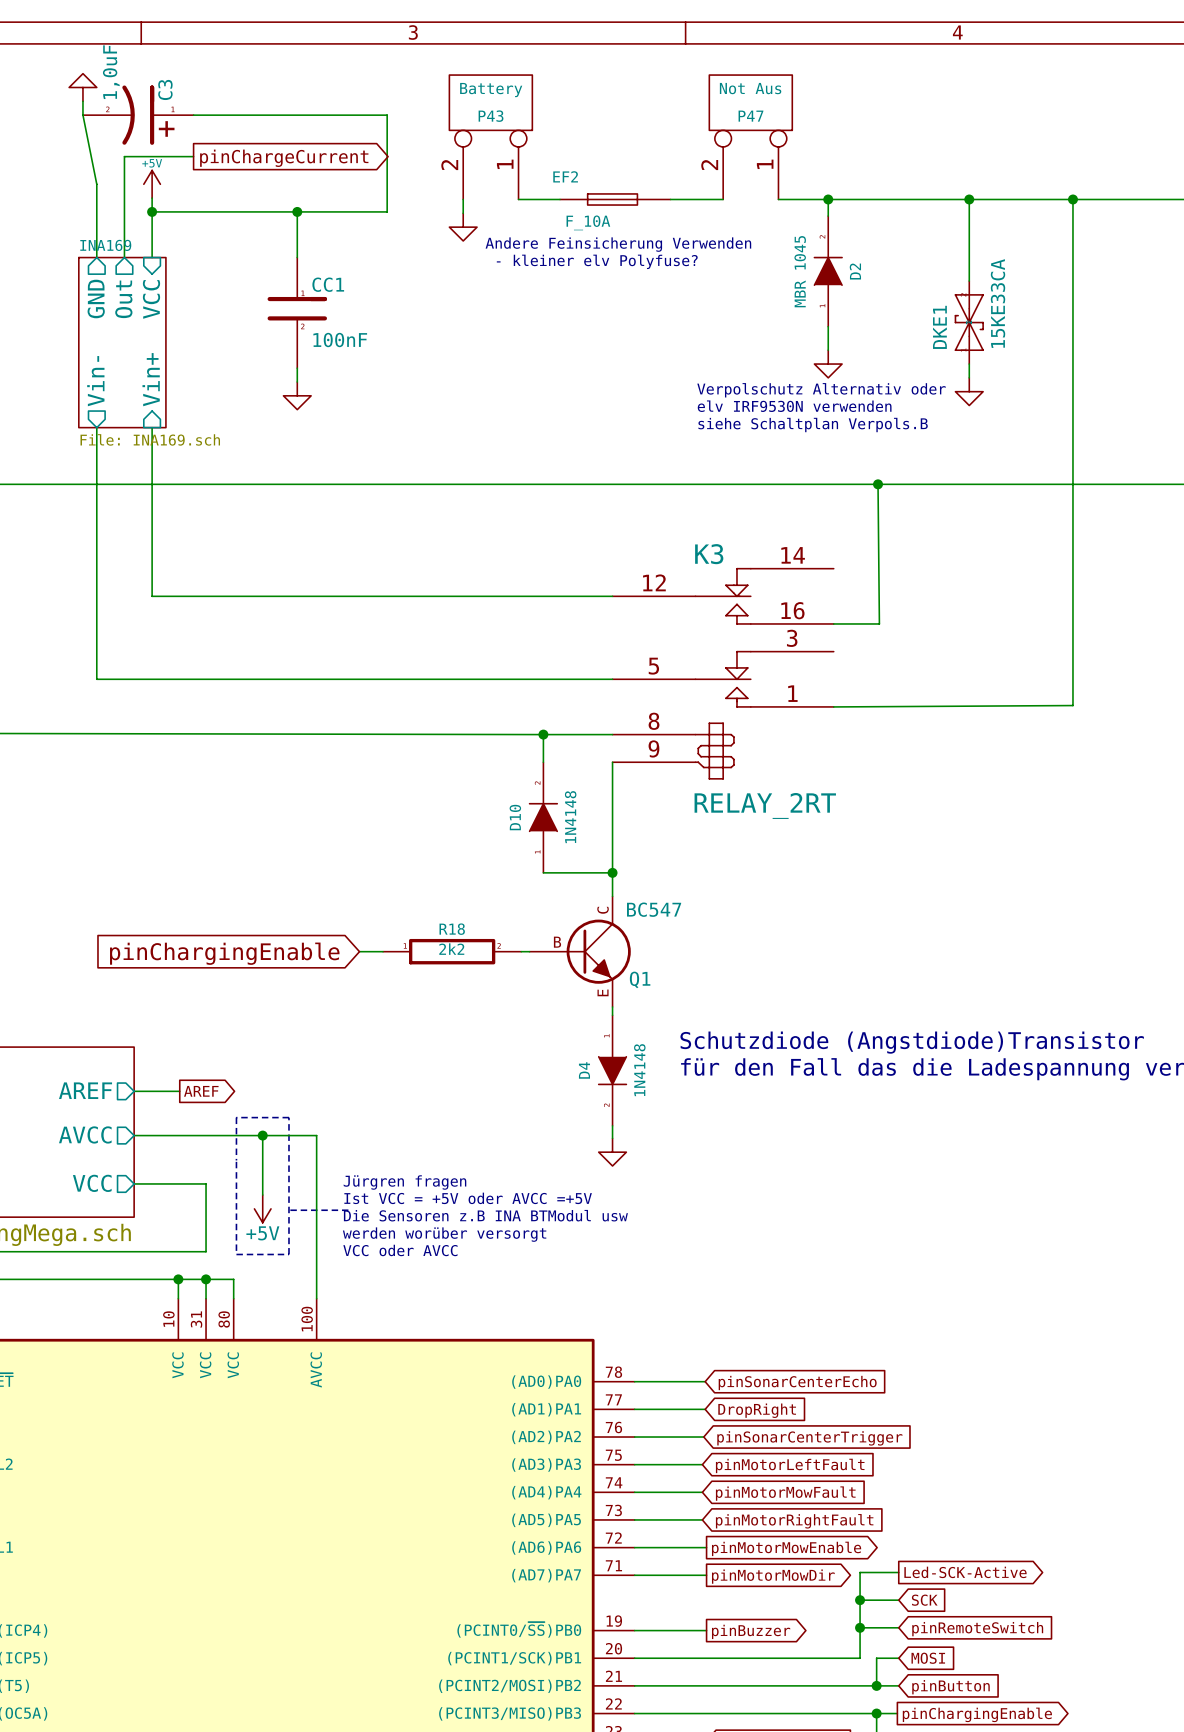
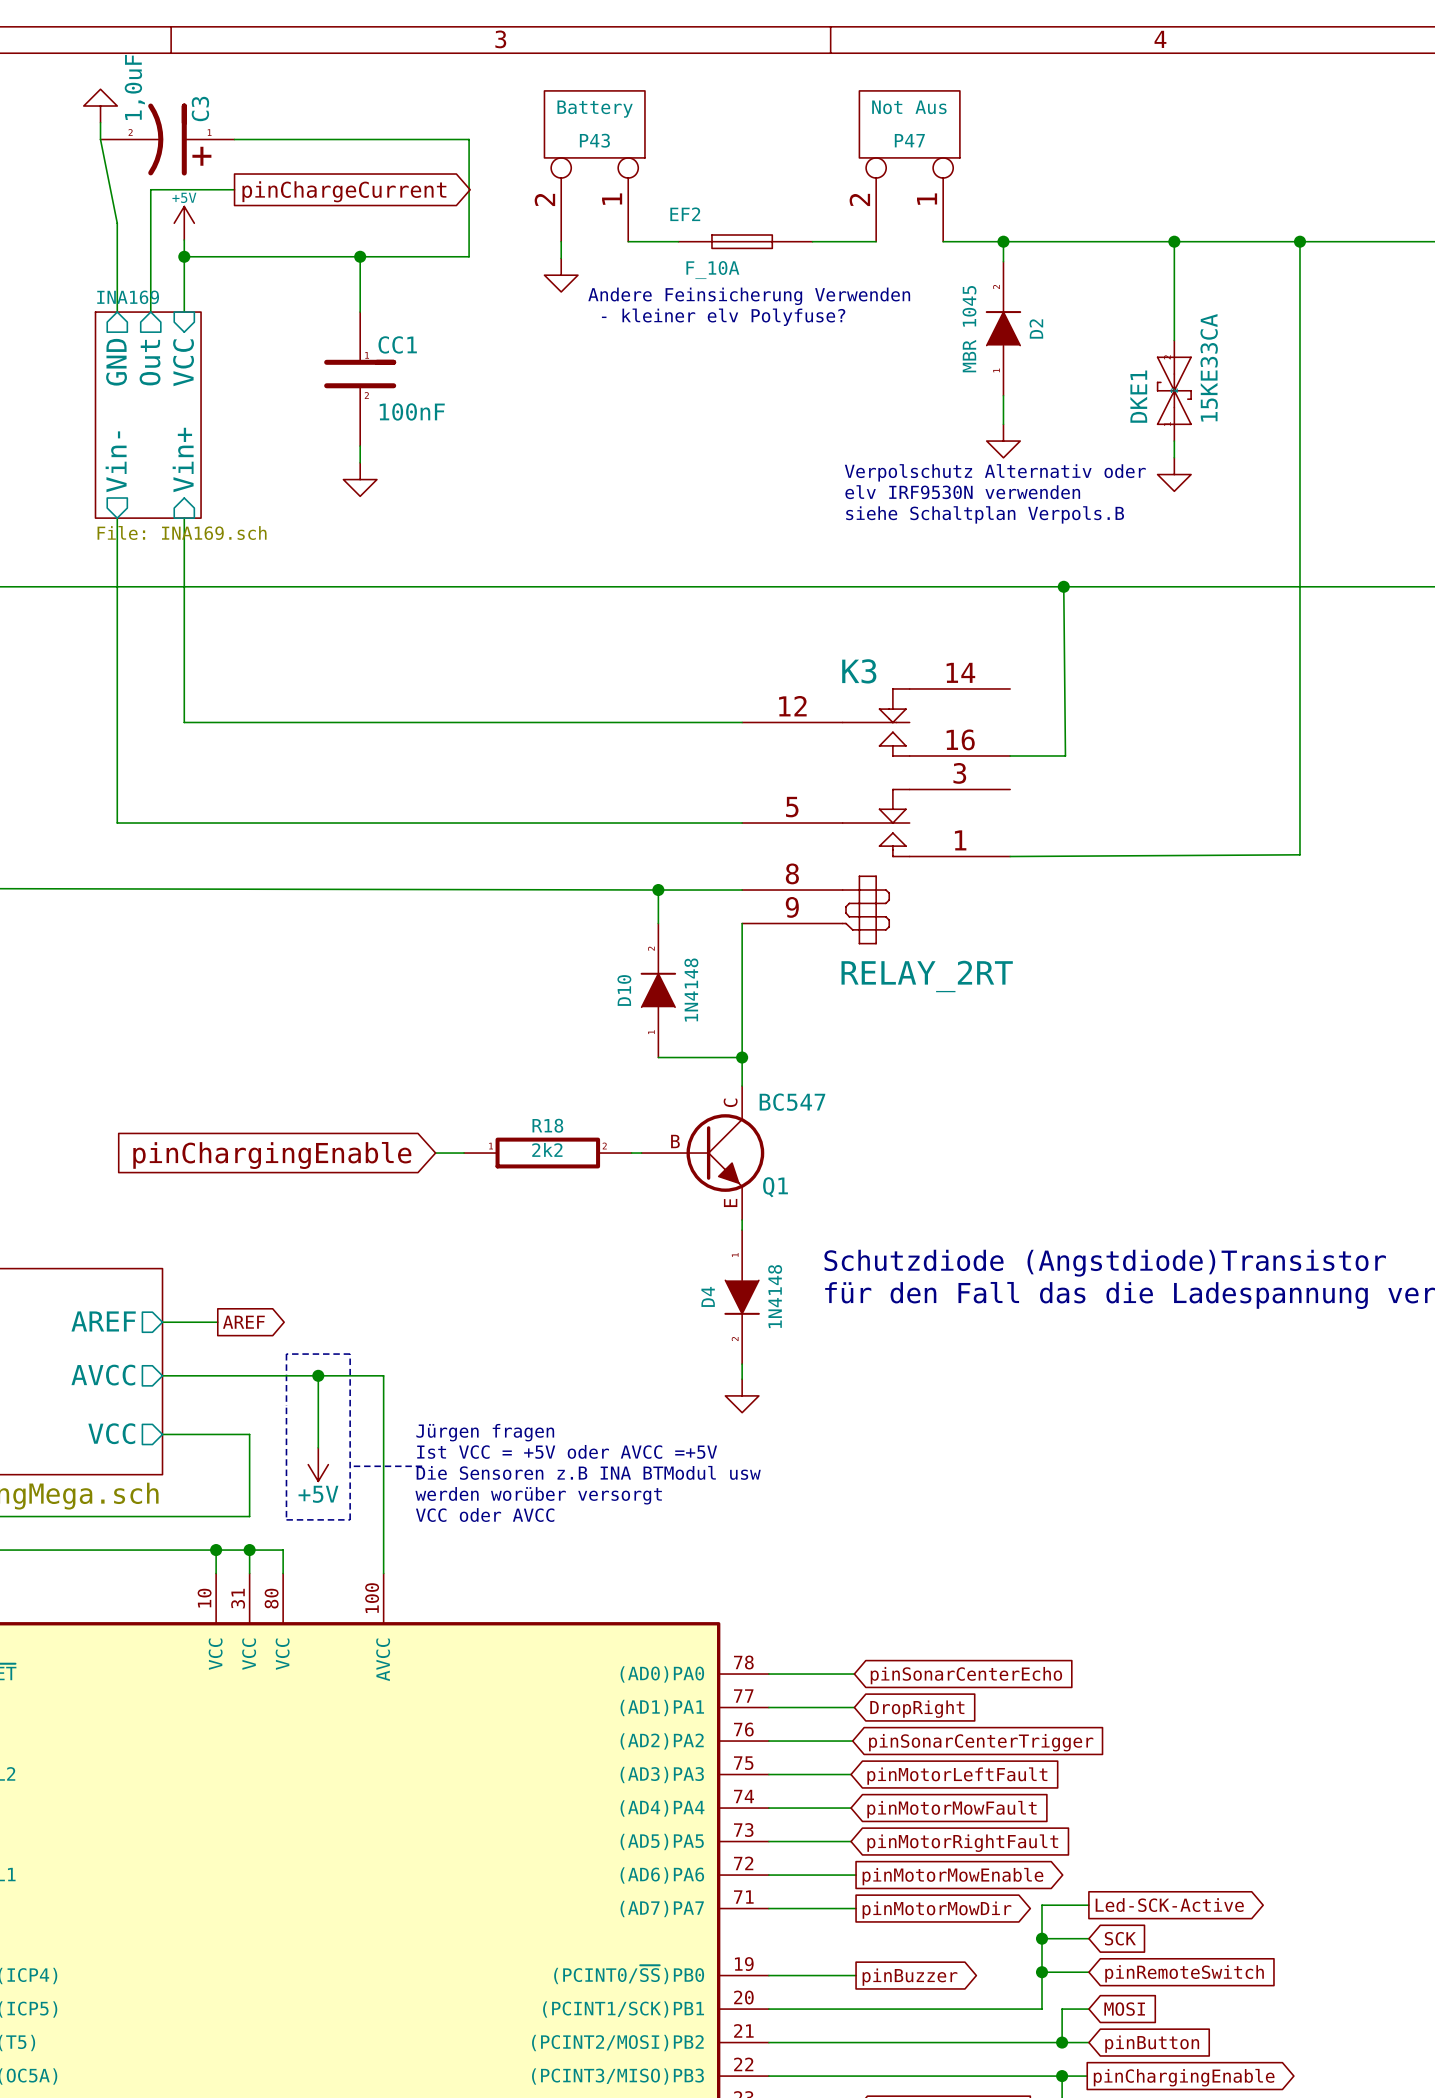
text: Jürgren fragen (404, 1182) -> Jürgen fragen (485, 1432)

